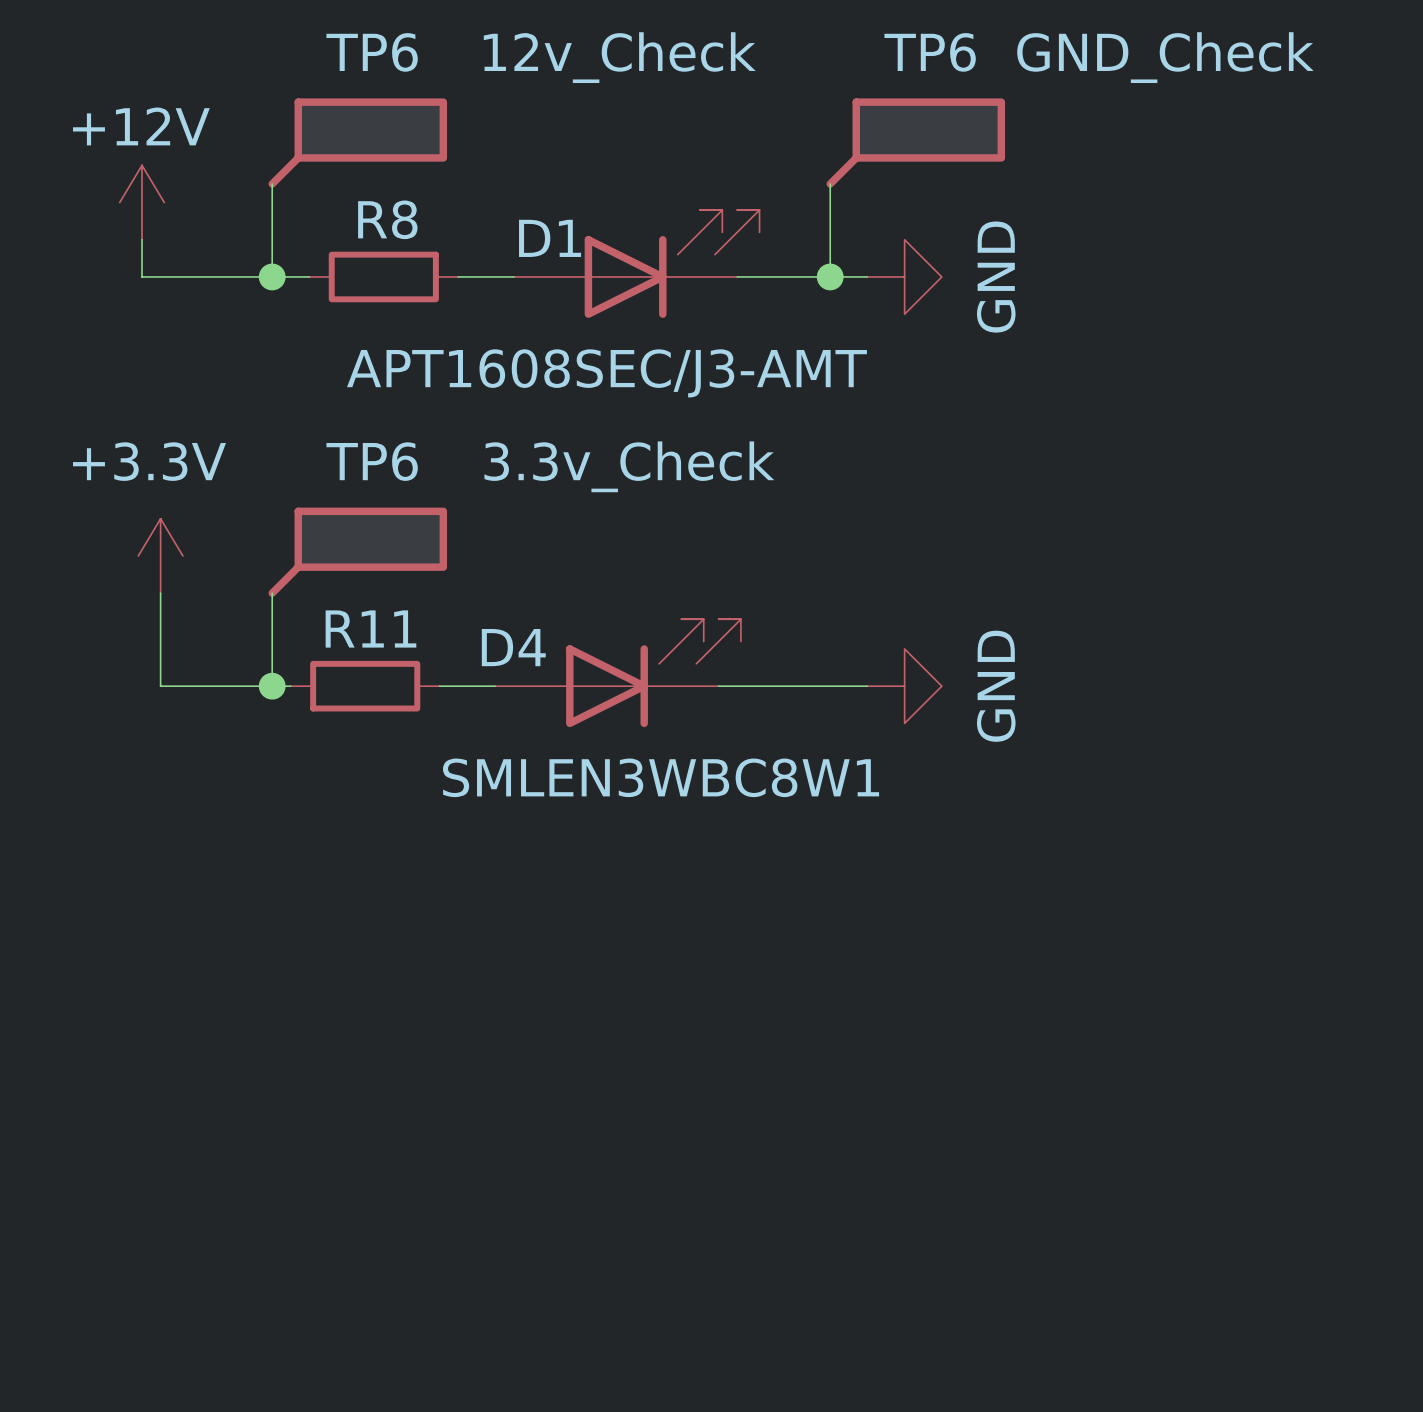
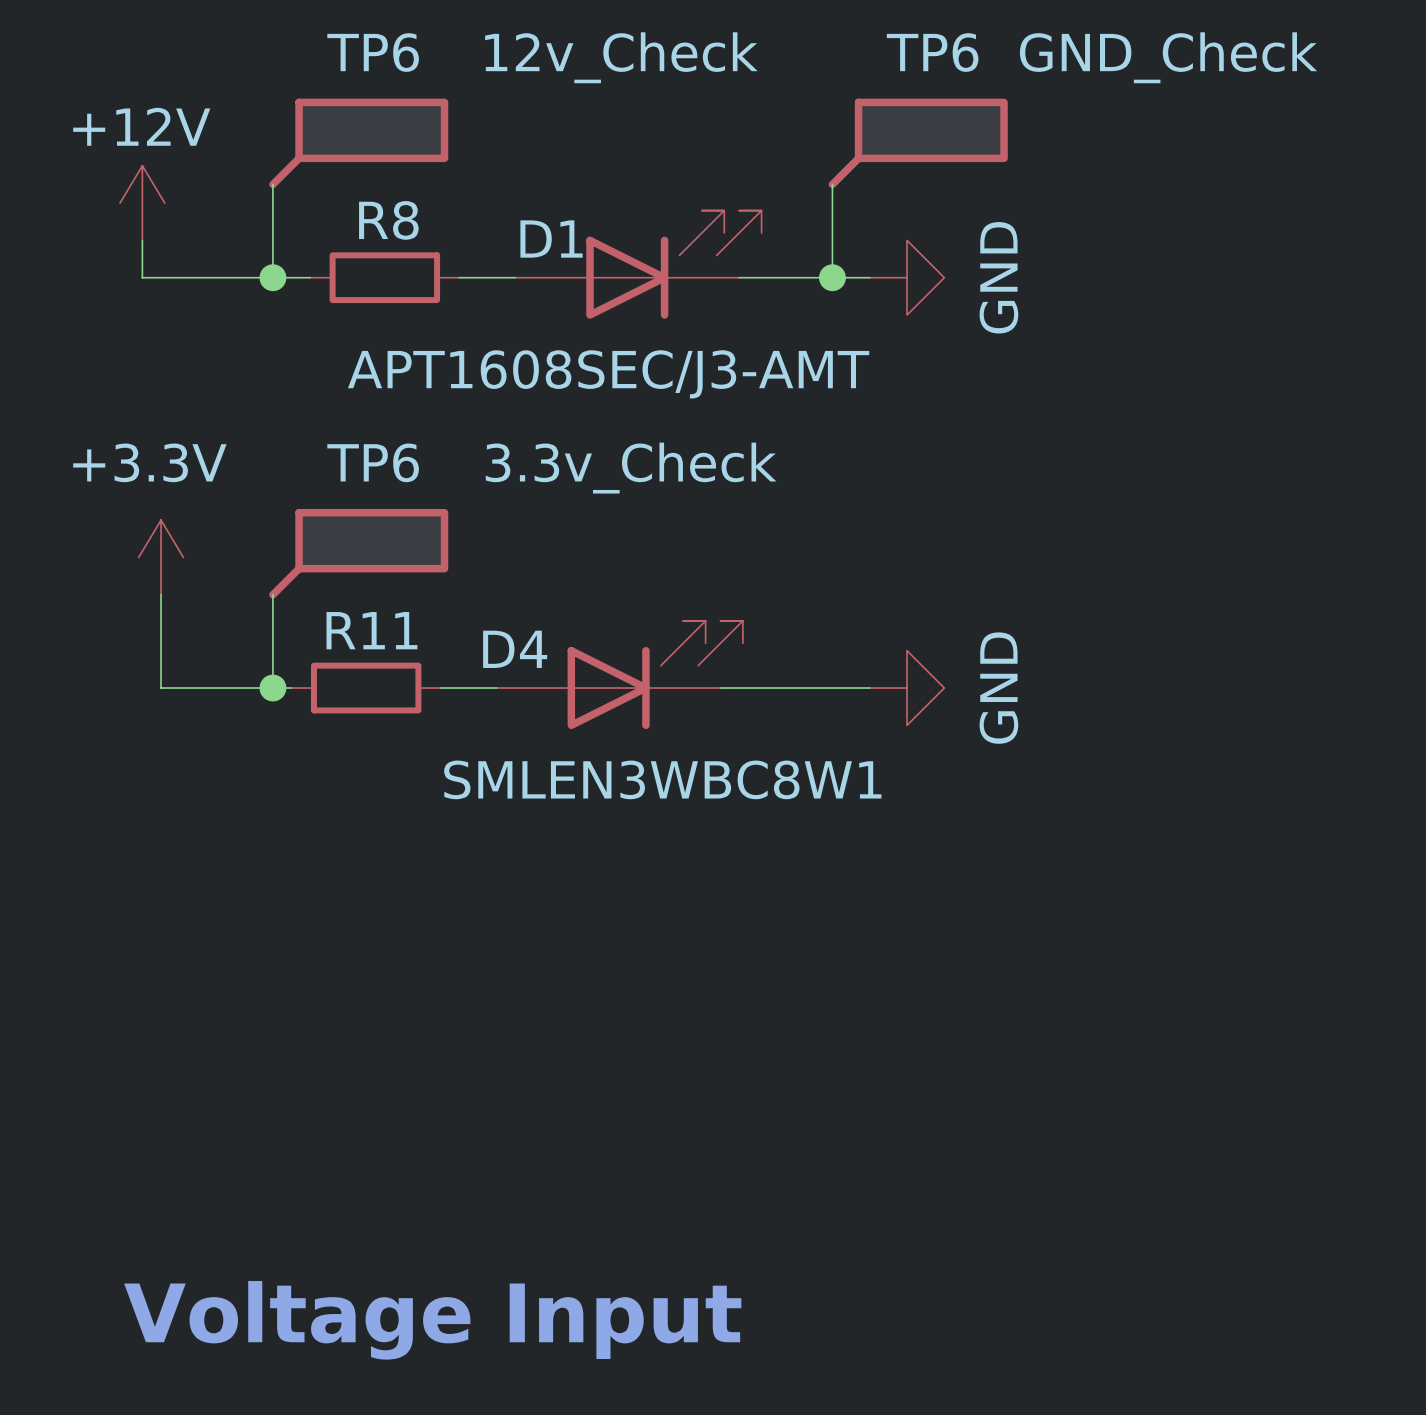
text: none -> Voltage Input (432, 1320)

